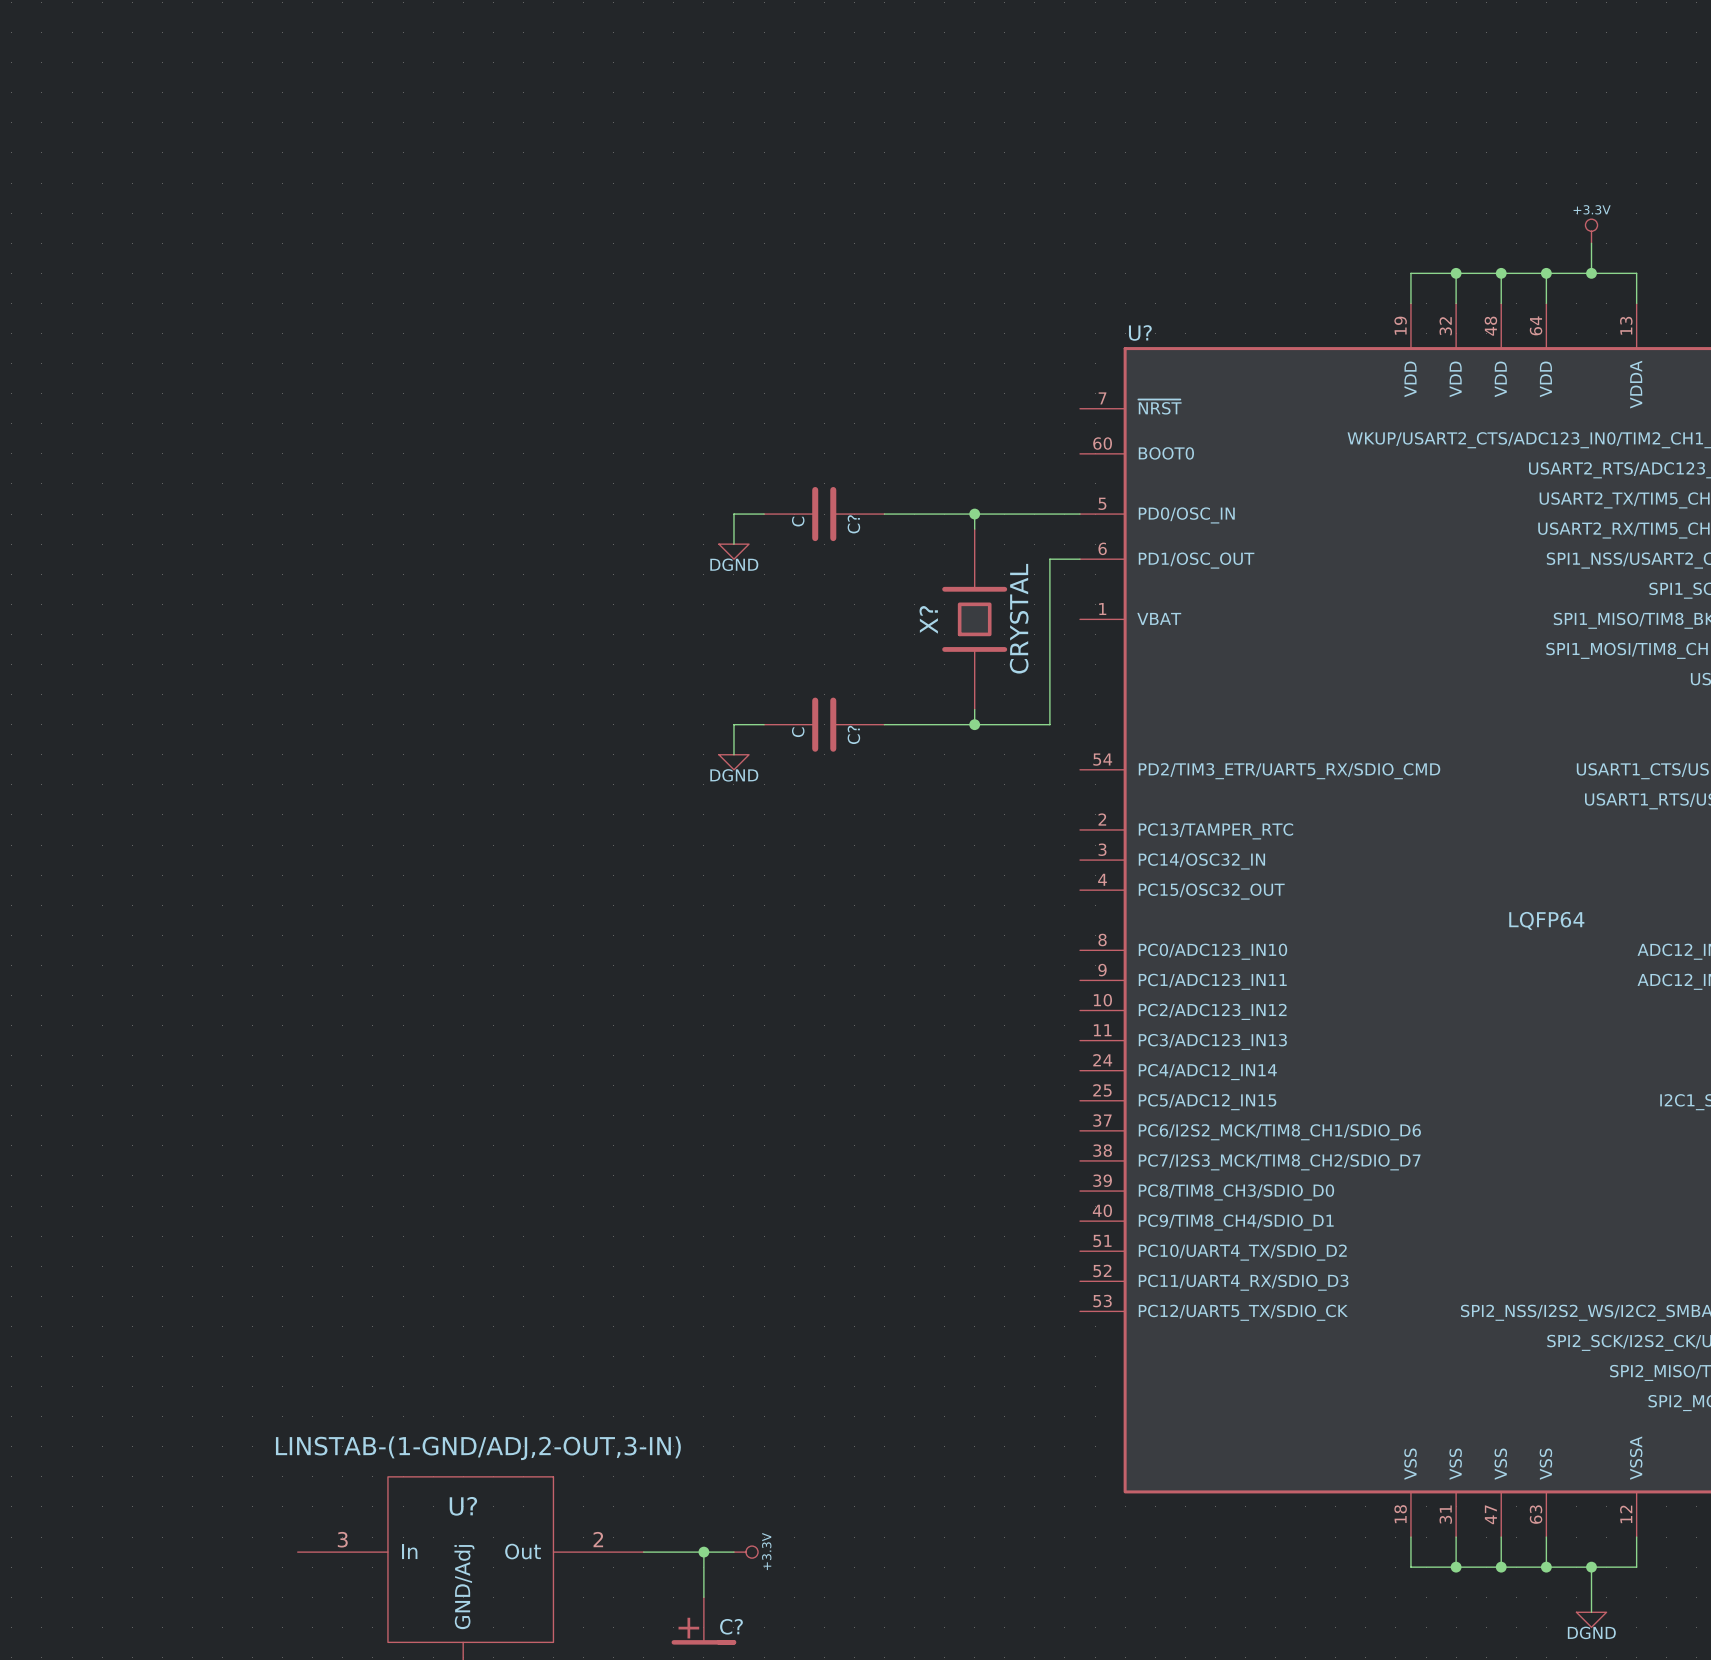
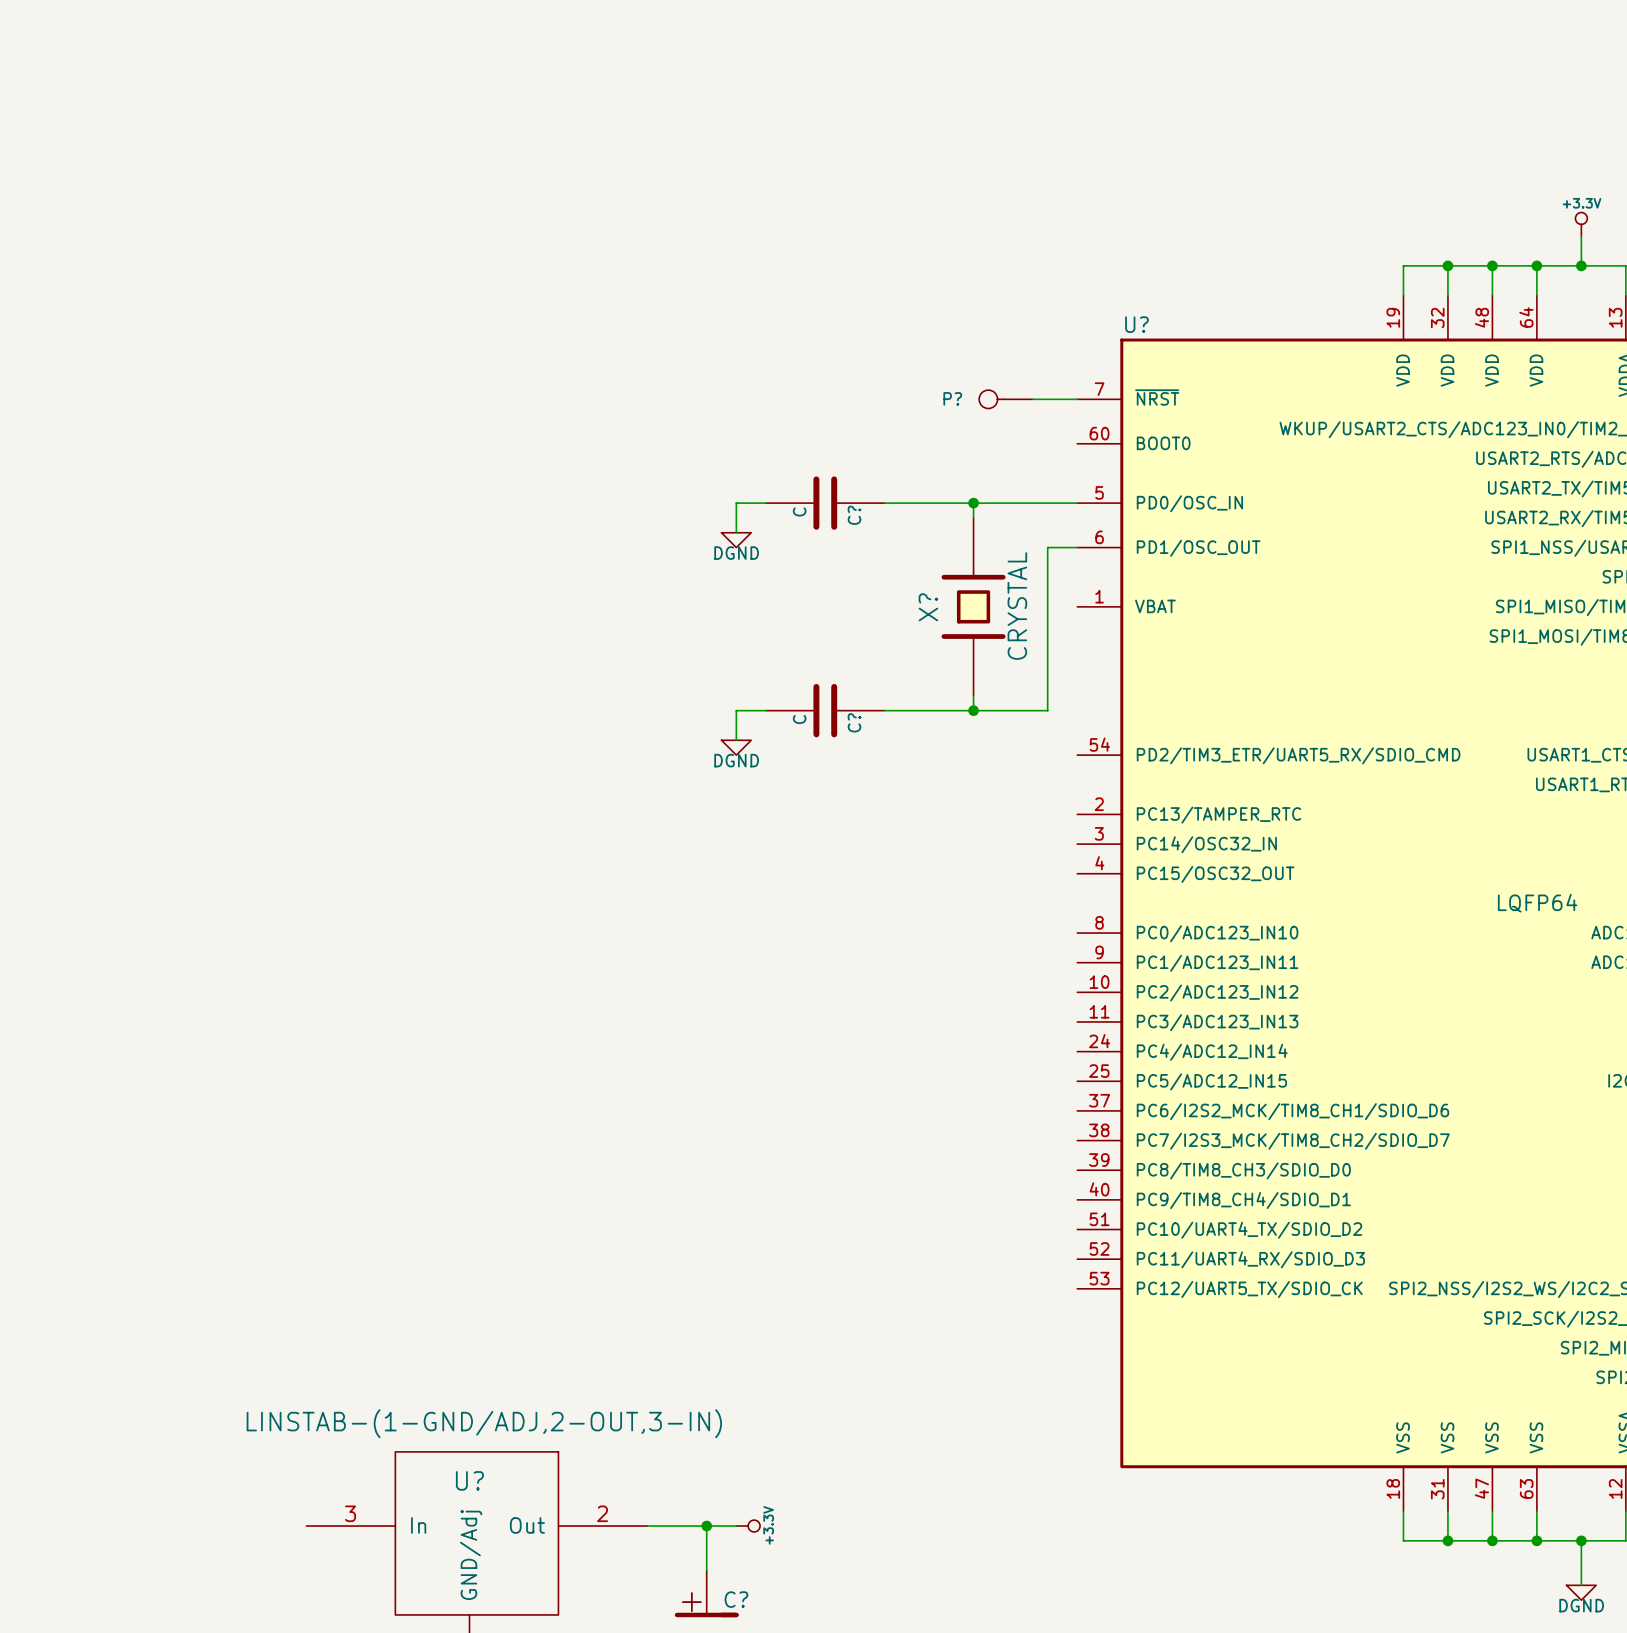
P?: none -> (1006, 399)
wire: none -> (1032, 399) (1077, 399)

